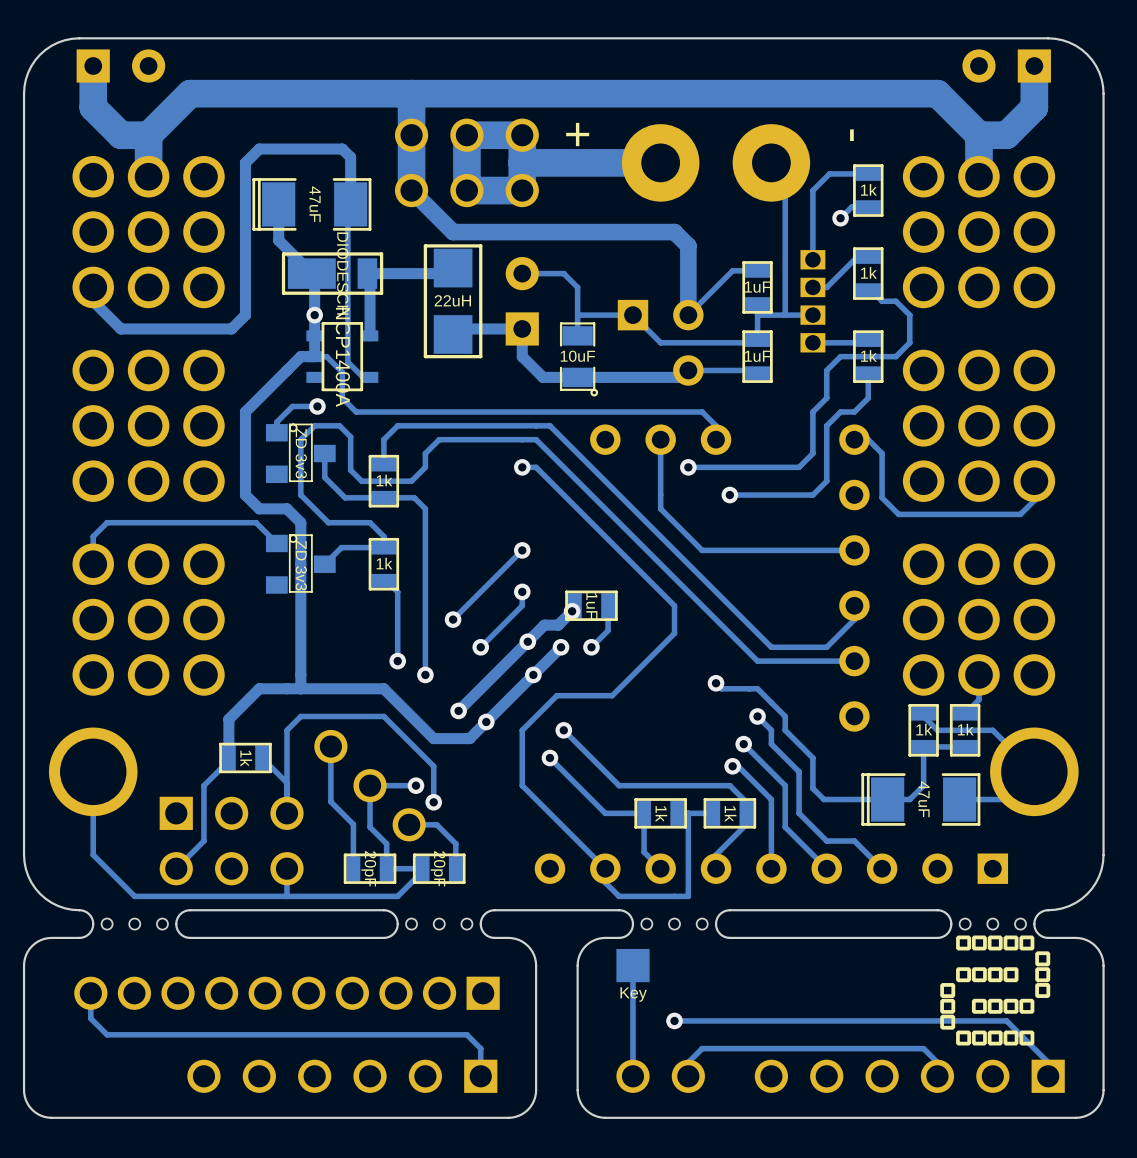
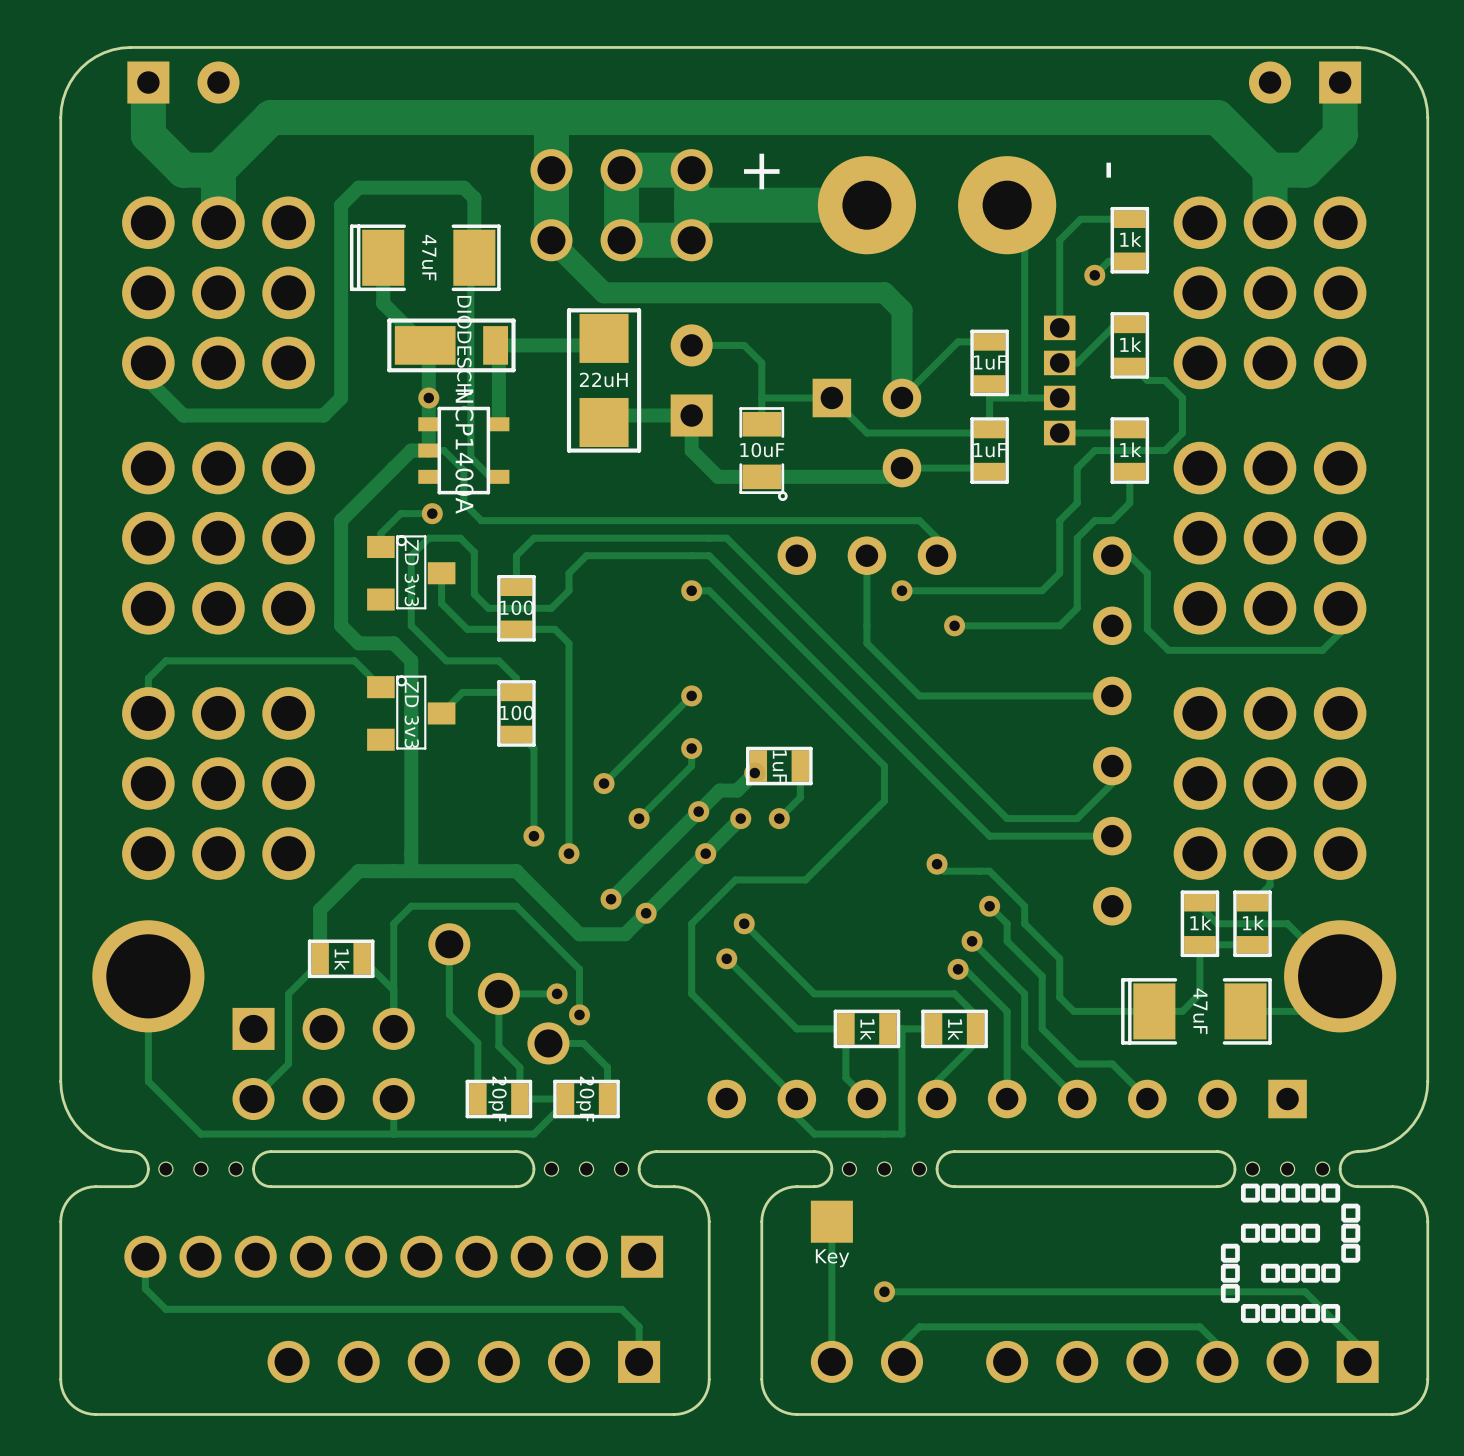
part value: 1k (384, 480) -> 100 (516, 607)
part value: 1k (384, 563) -> 100 (516, 712)

